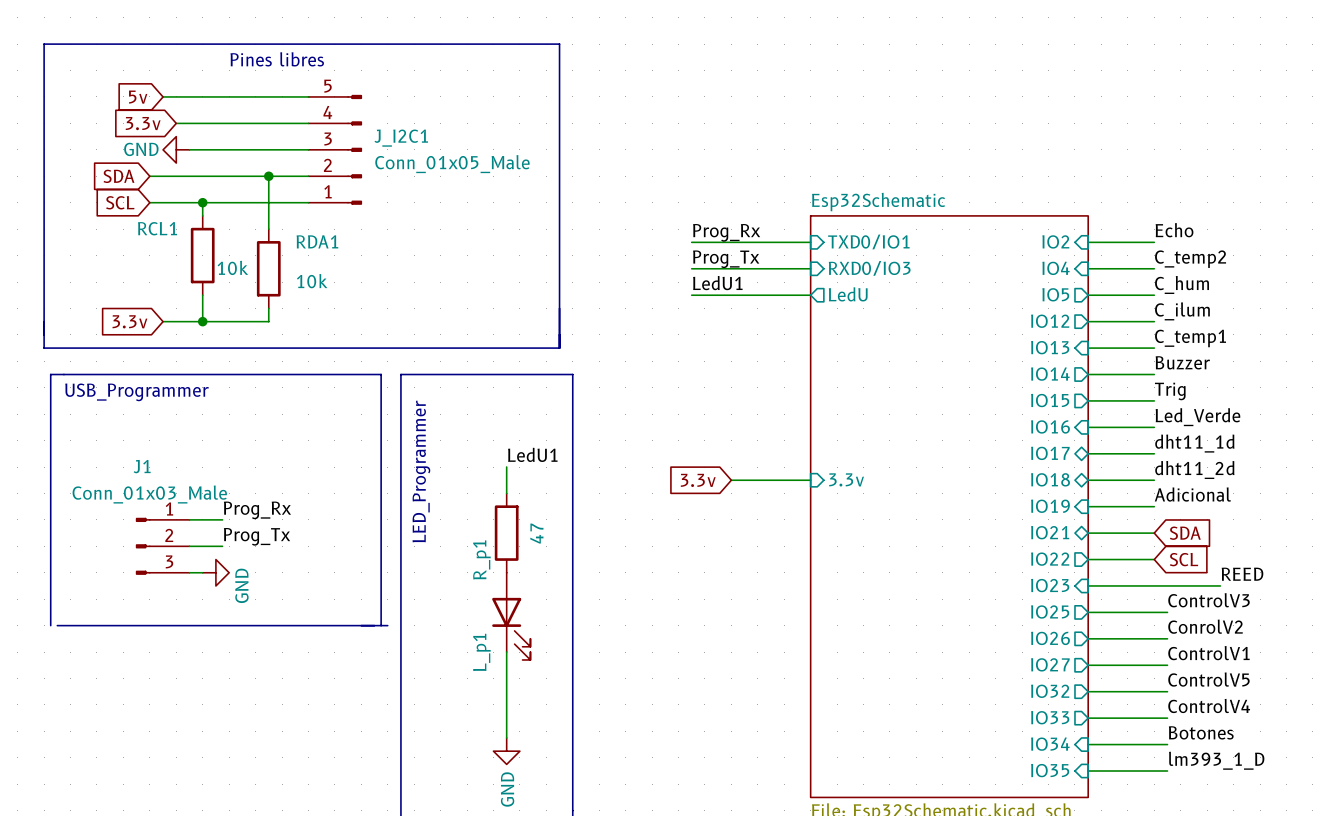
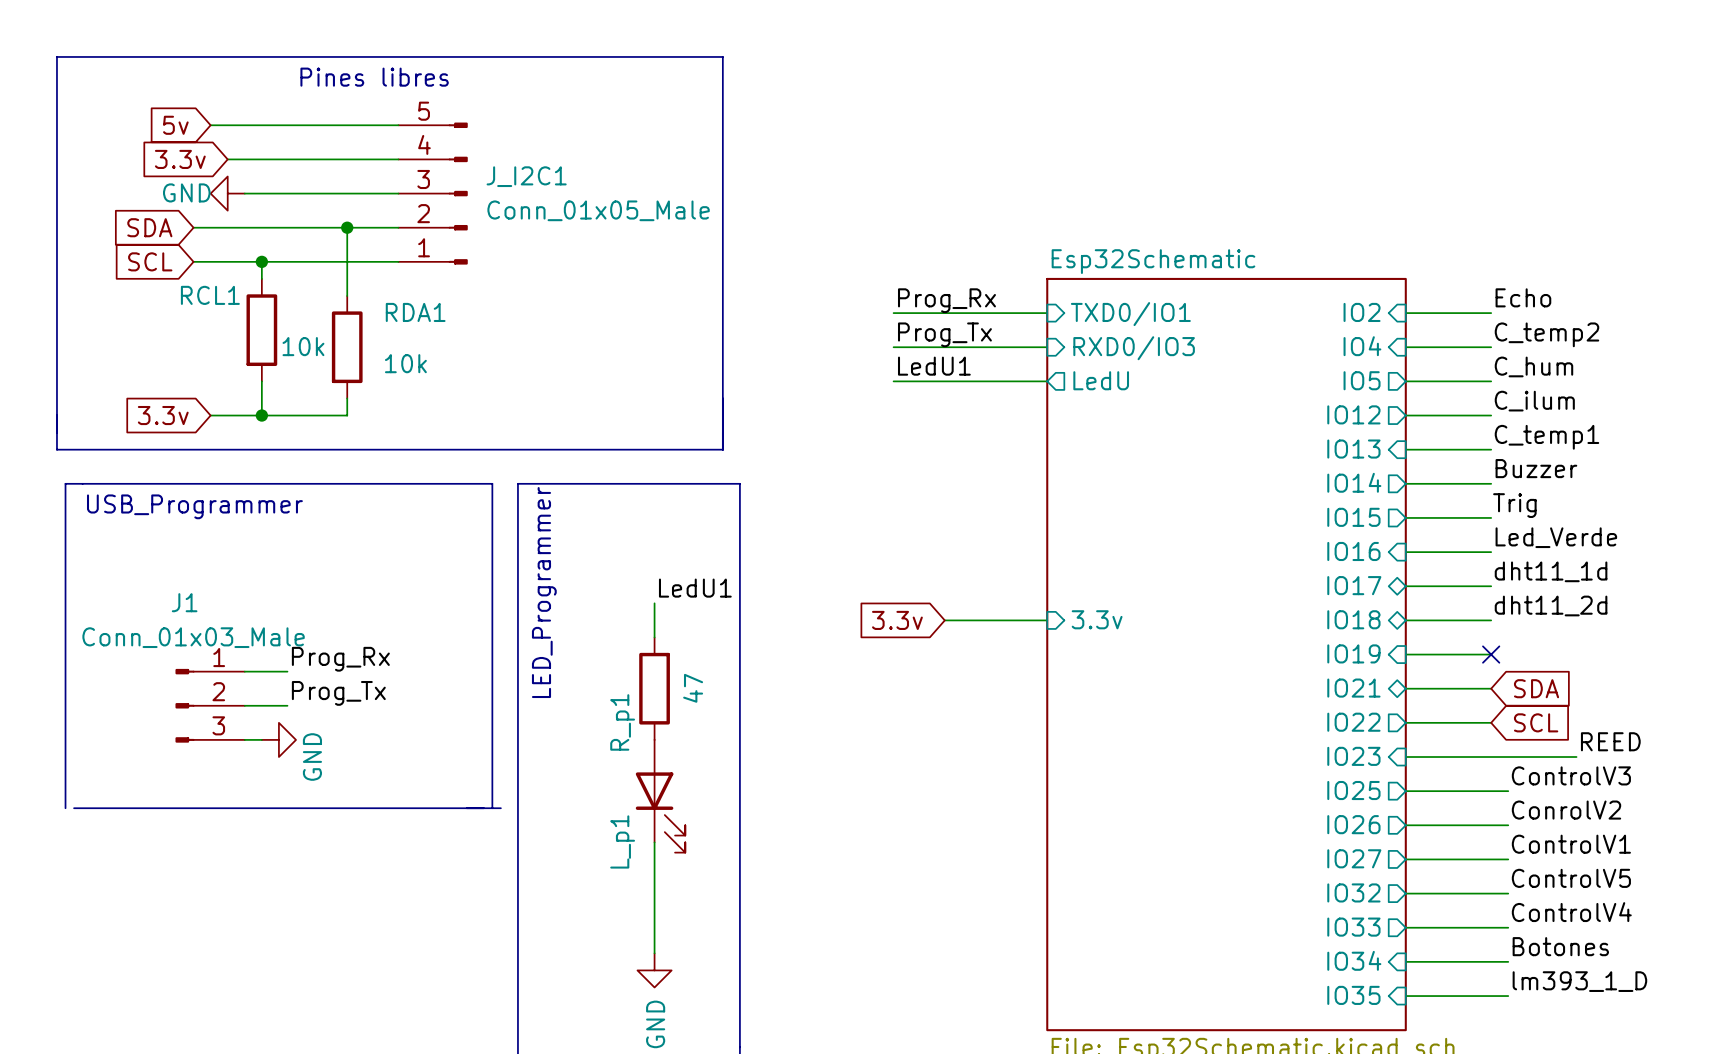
label: Adicional (1192, 494) -> none
no-connect mark: none -> (1491, 654)

